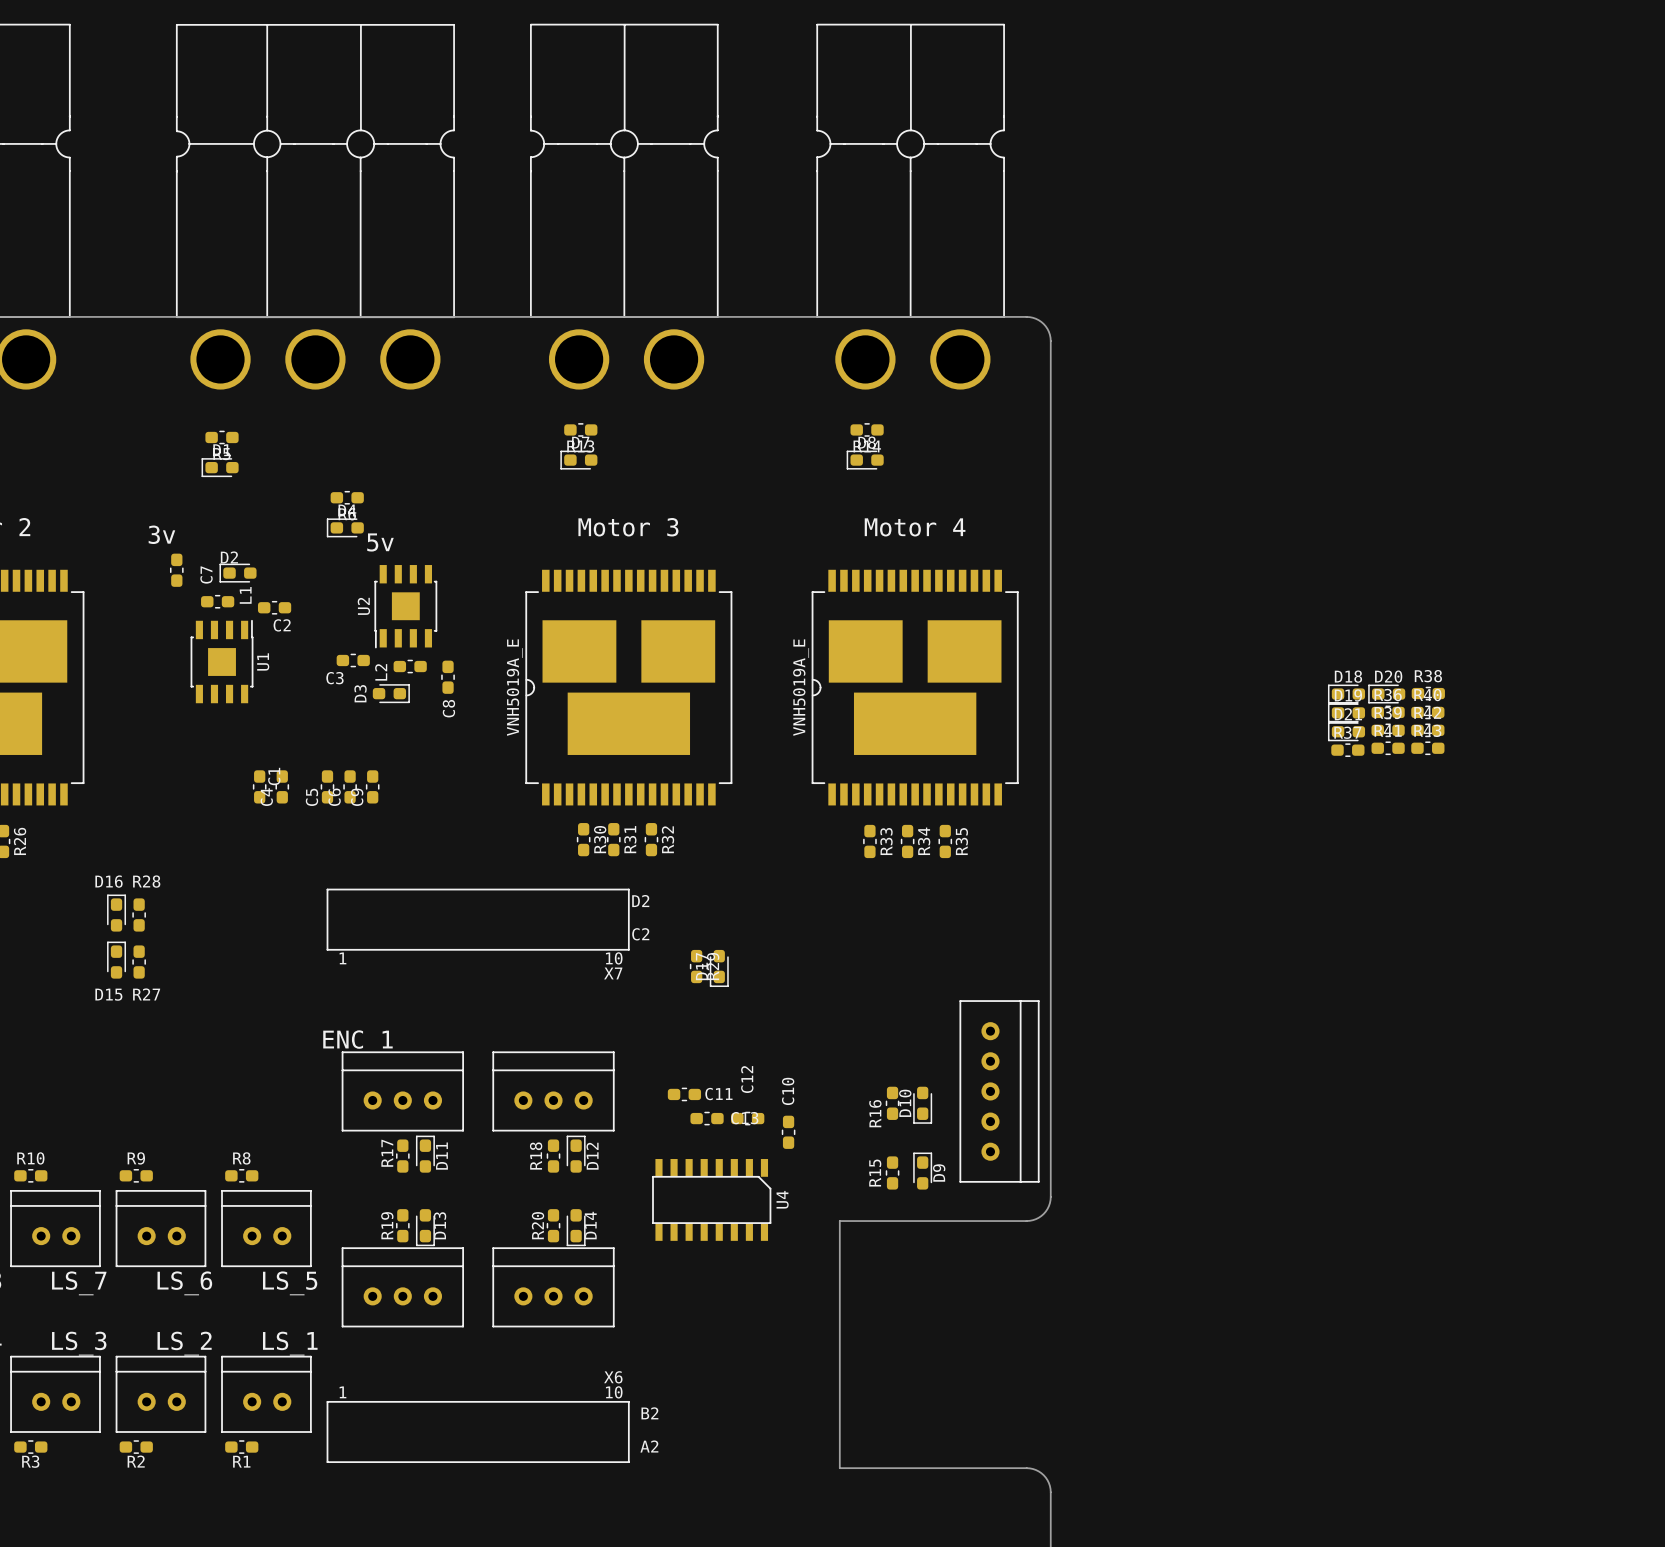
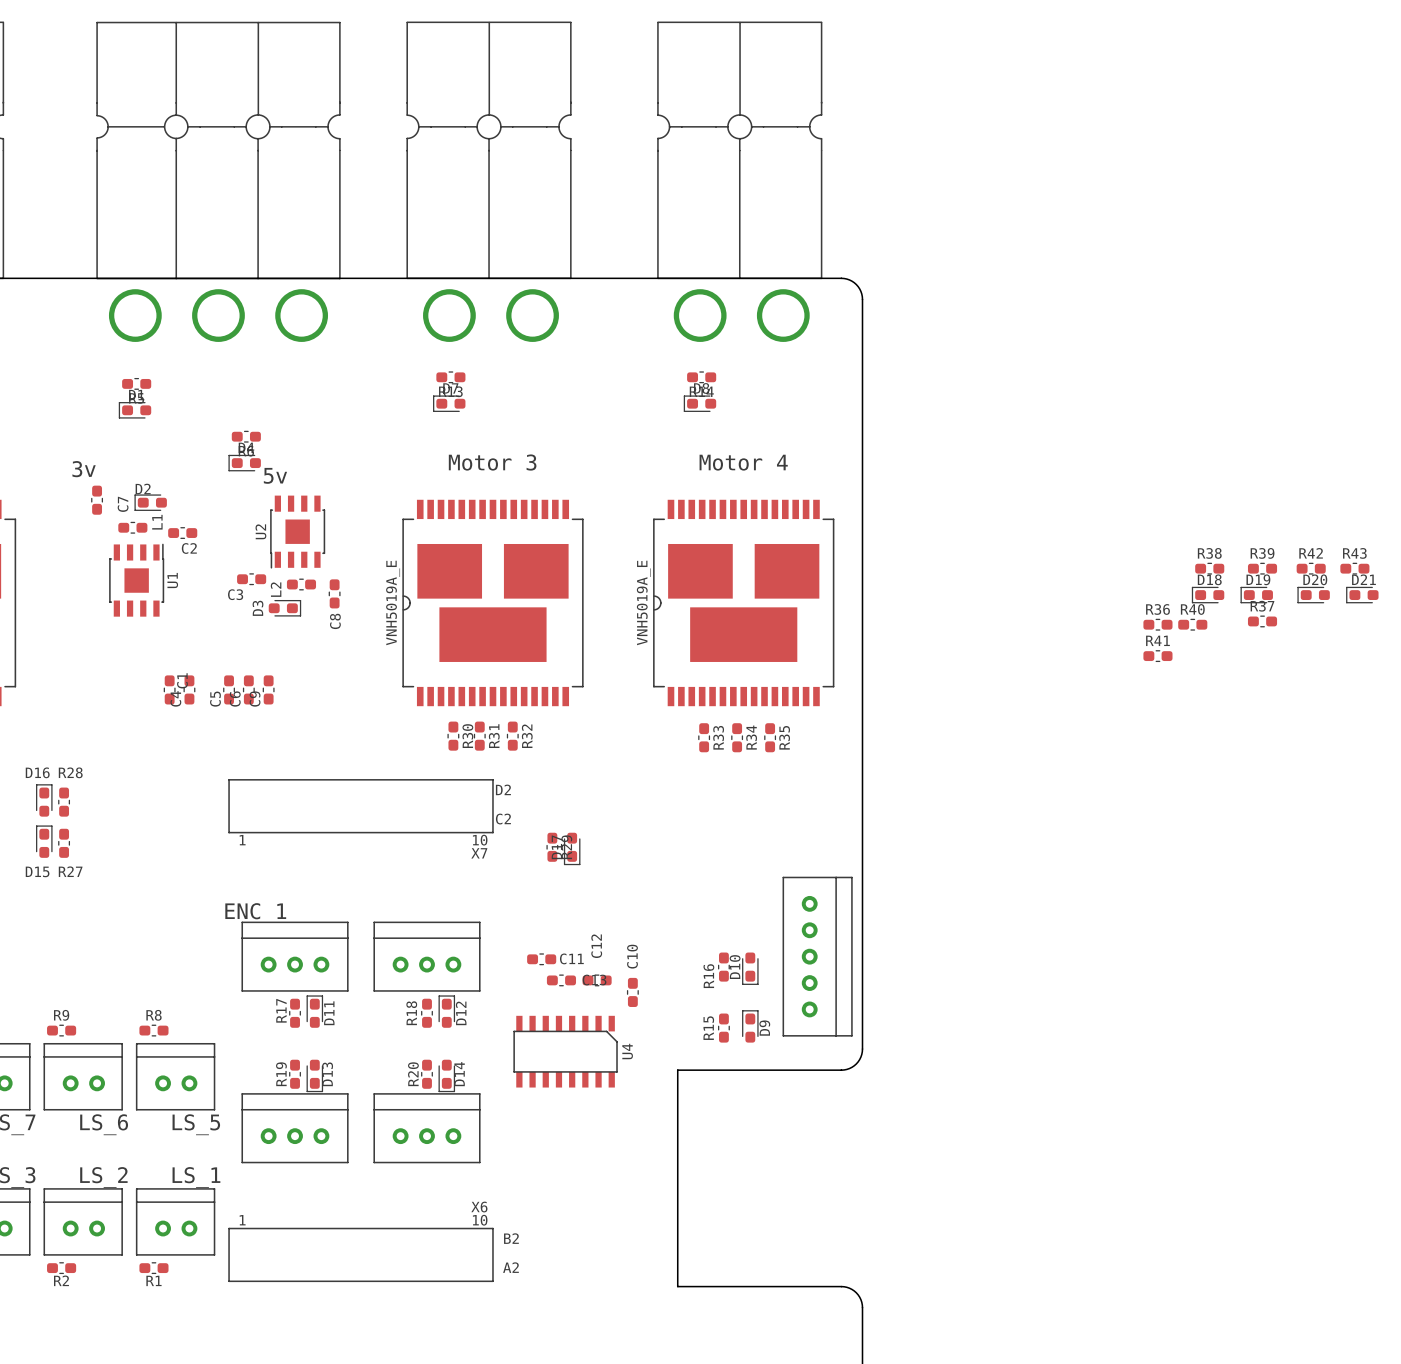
R38 position: (1428, 693) -> (1209, 568)
D18 position: (1346, 694) -> (1208, 595)
D20 position: (1386, 694) -> (1313, 595)
D19 position: (1346, 712) -> (1256, 595)
R39 position: (1388, 730) -> (1262, 568)
R42 position: (1427, 730) -> (1311, 568)
D21 position: (1346, 731) -> (1362, 595)
R43 position: (1427, 748) -> (1354, 568)
R37 position: (1347, 750) -> (1262, 621)

